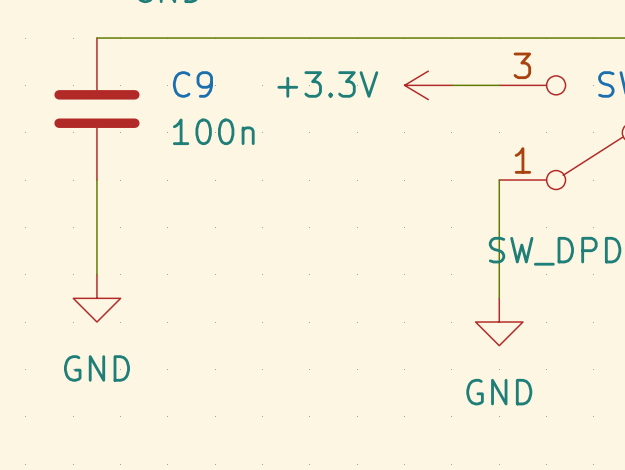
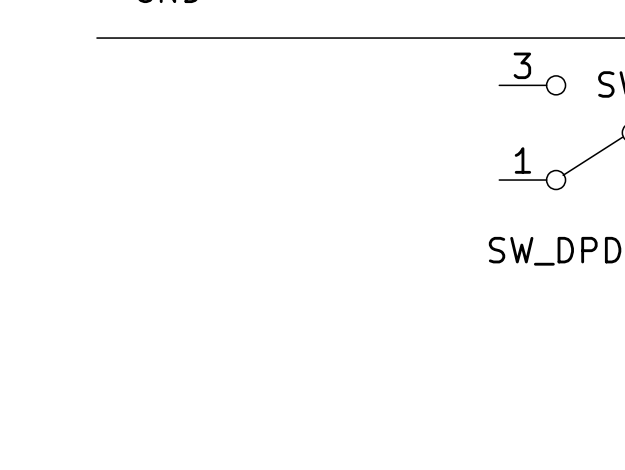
power symbol: +3.3V (428, 85) -> none
wire: (451, 85) (499, 85) -> none
C9: 100n (96, 109) -> none
wire: (96, 180) (96, 274) -> none
wire: (499, 180) (499, 298) -> none
power symbol: GND (96, 298) -> none
power symbol: GND (499, 322) -> none

